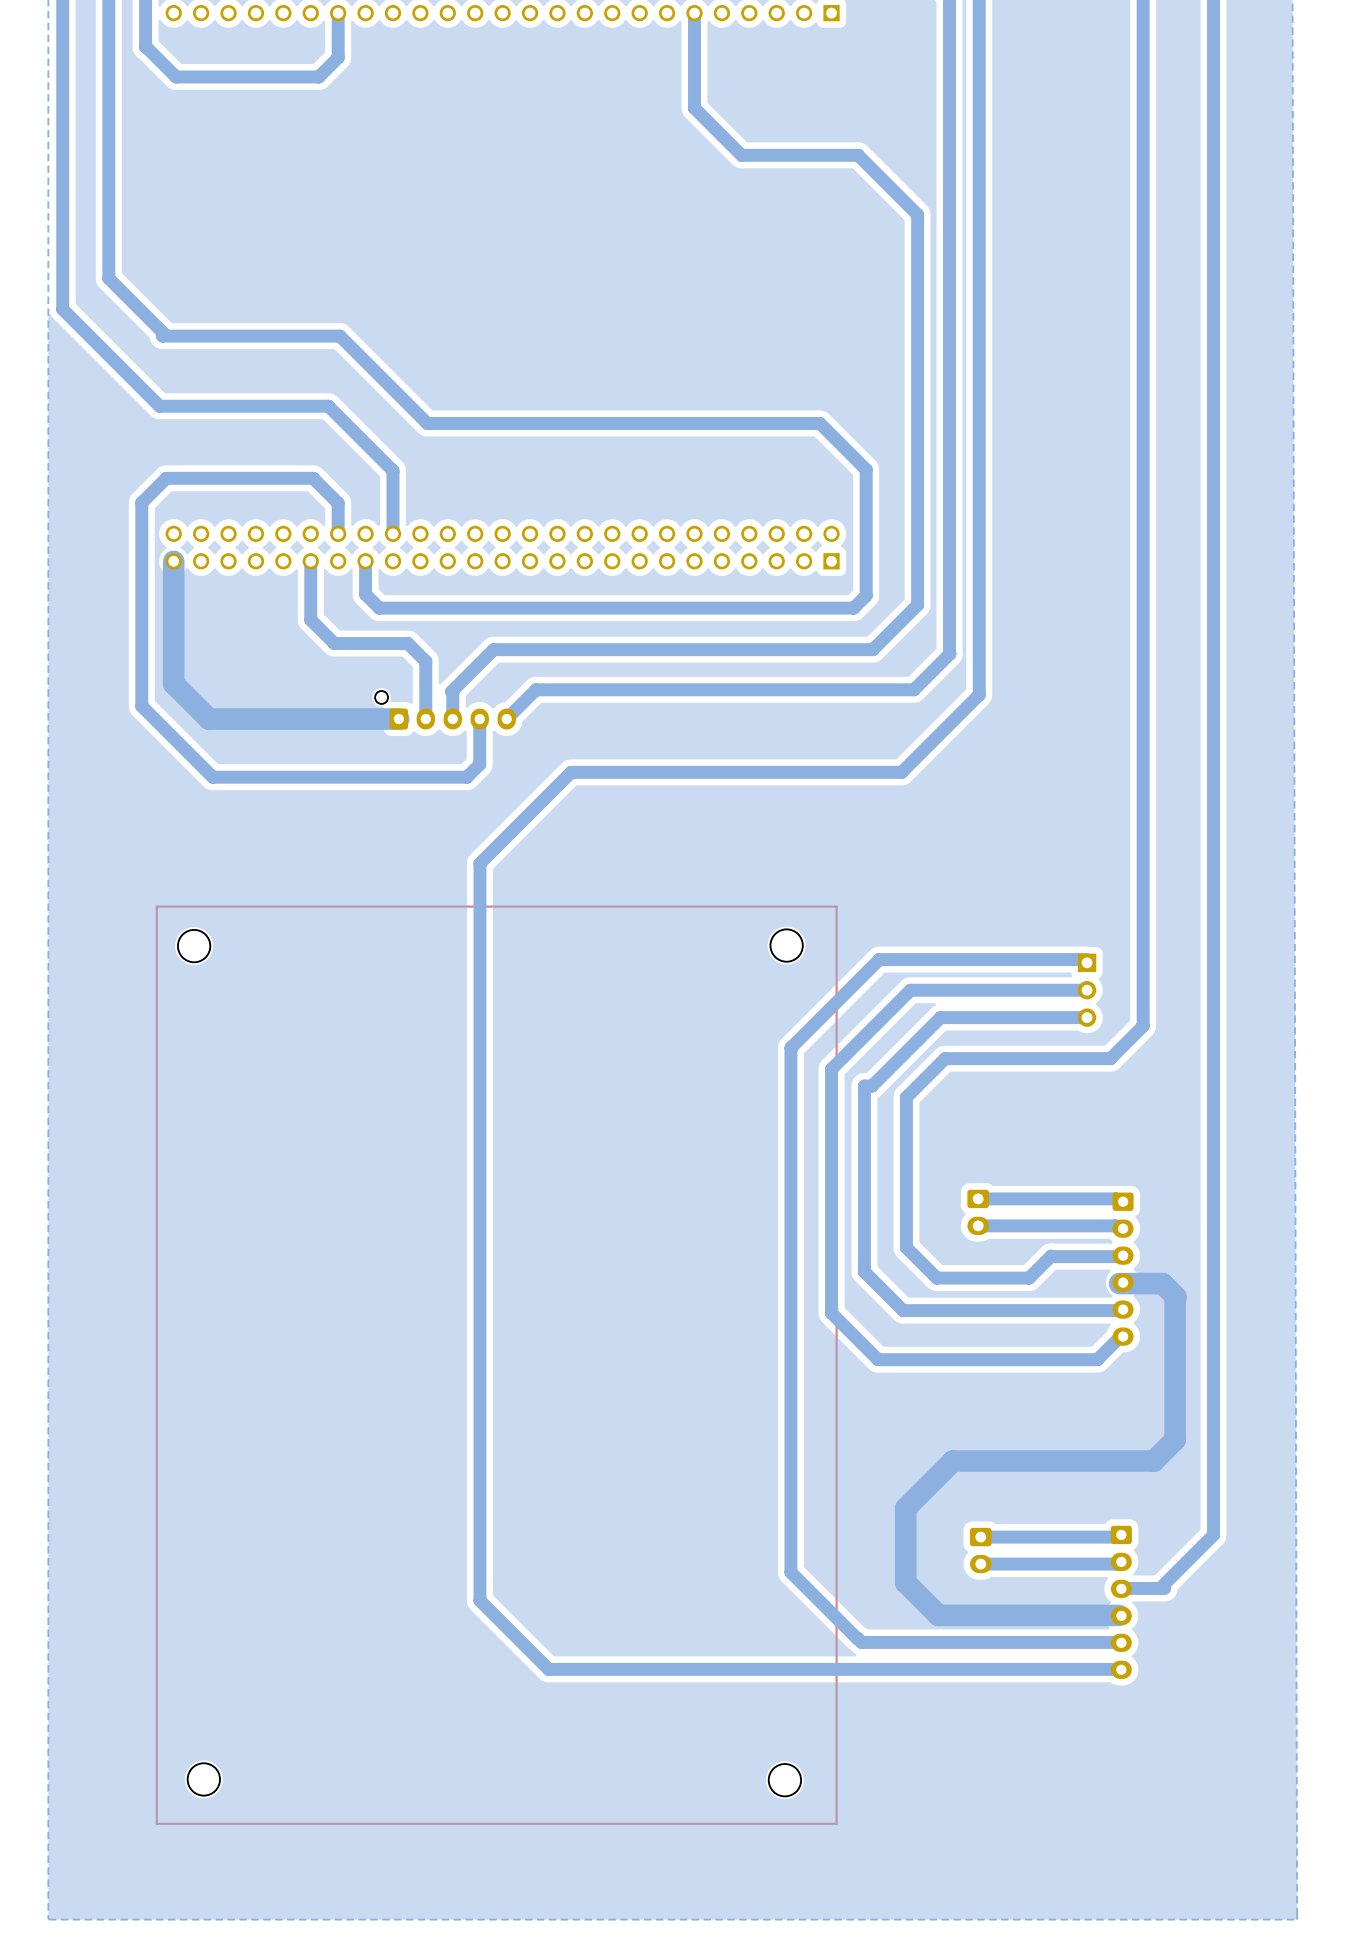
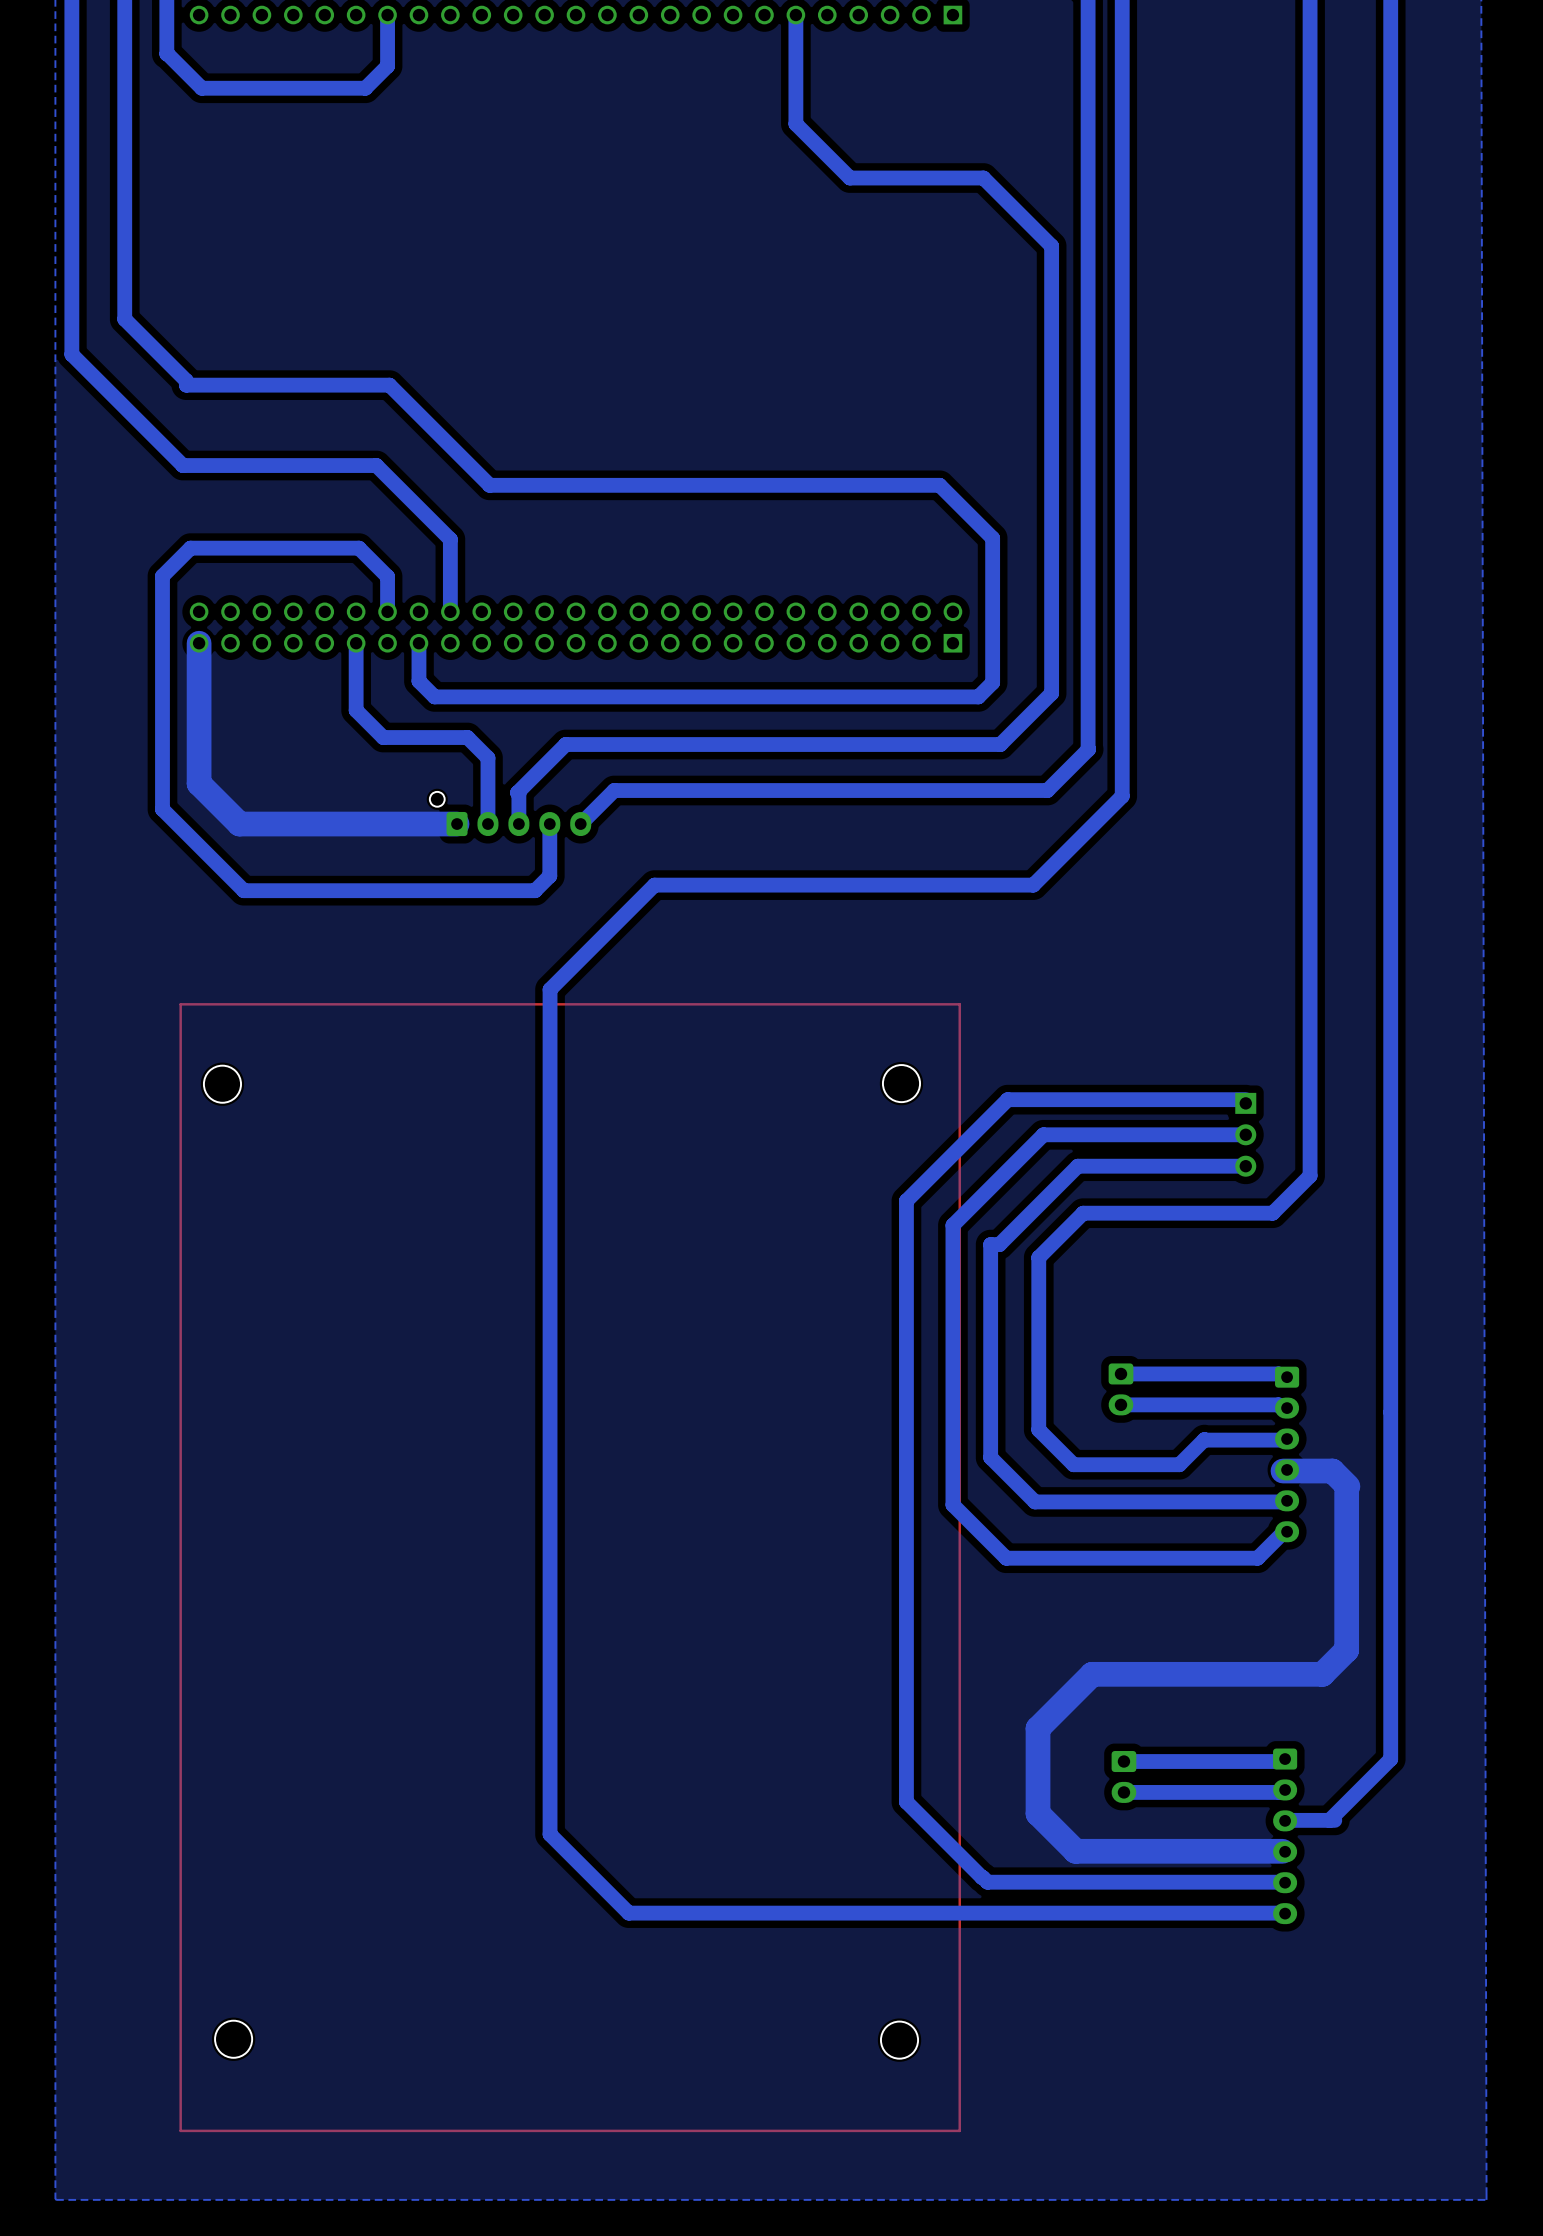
top track: (836, 906) (156, 906) (156, 1823) (836, 1823) (836, 906) -> (959, 1004) (959, 2130) (180, 2130) (180, 1004) (959, 1004)

